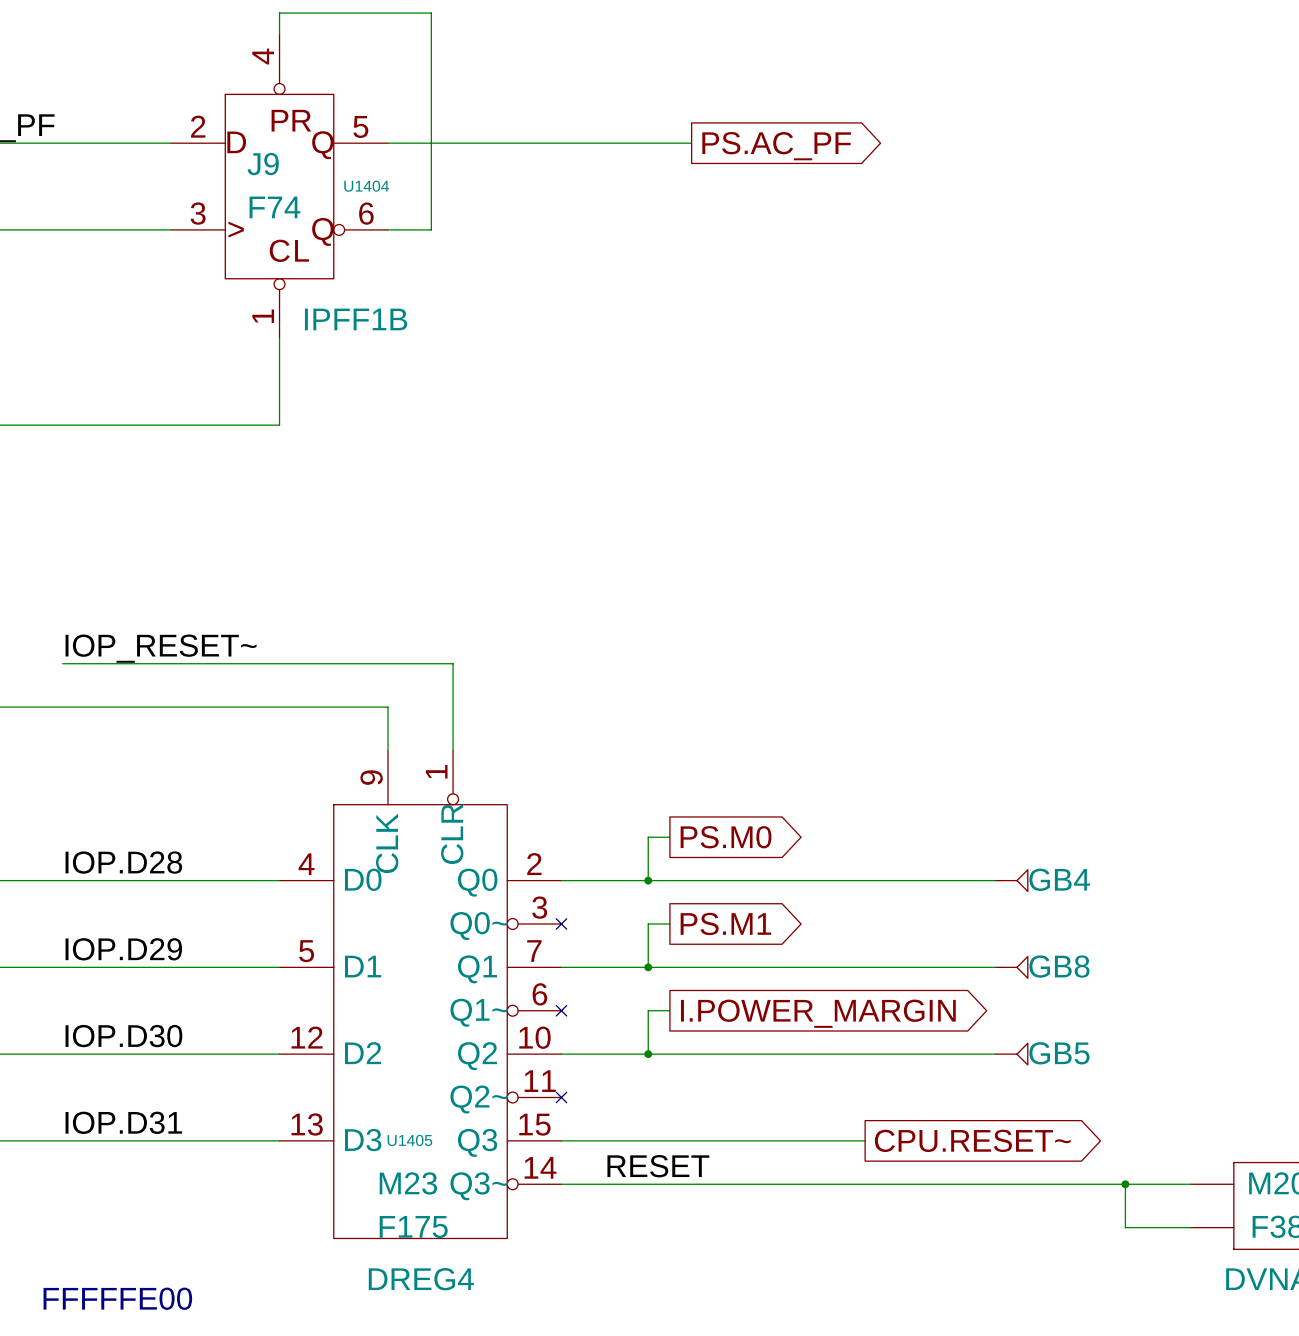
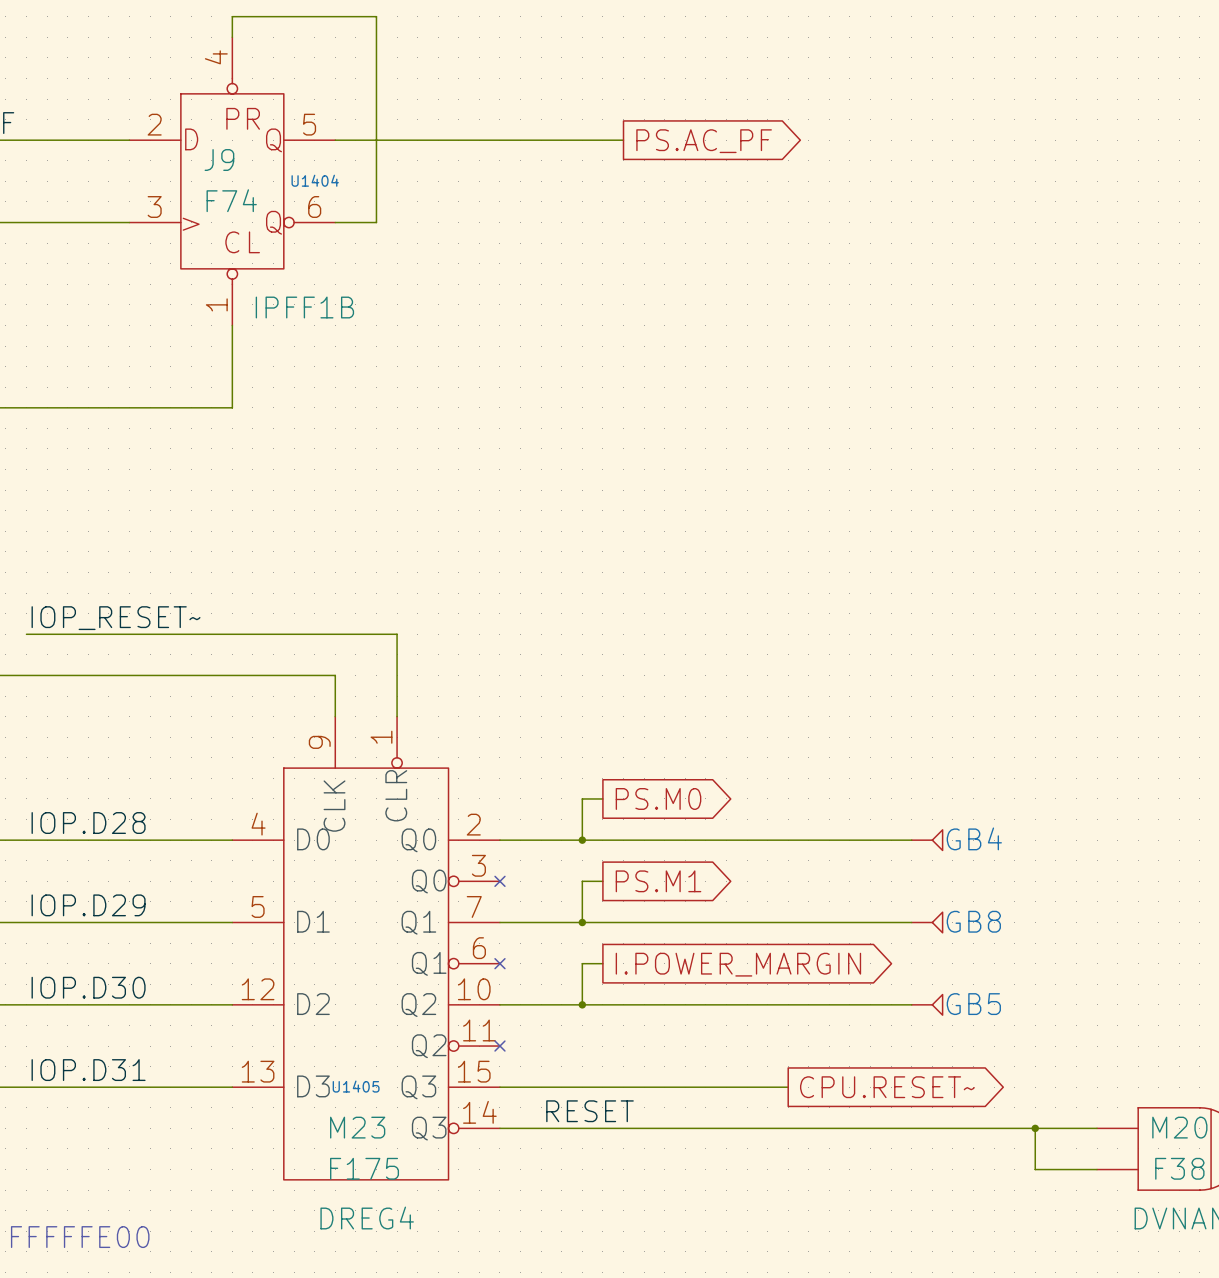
U1405 pin name: Q0~ (479, 925) -> Q0 (429, 881)
U1405 pin name: Q1~ (479, 1012) -> Q1 (429, 963)
U1405 pin name: Q2~ (479, 1099) -> Q2 (429, 1046)
U1405 pin name: Q3~ (479, 1186) -> Q3 (429, 1128)

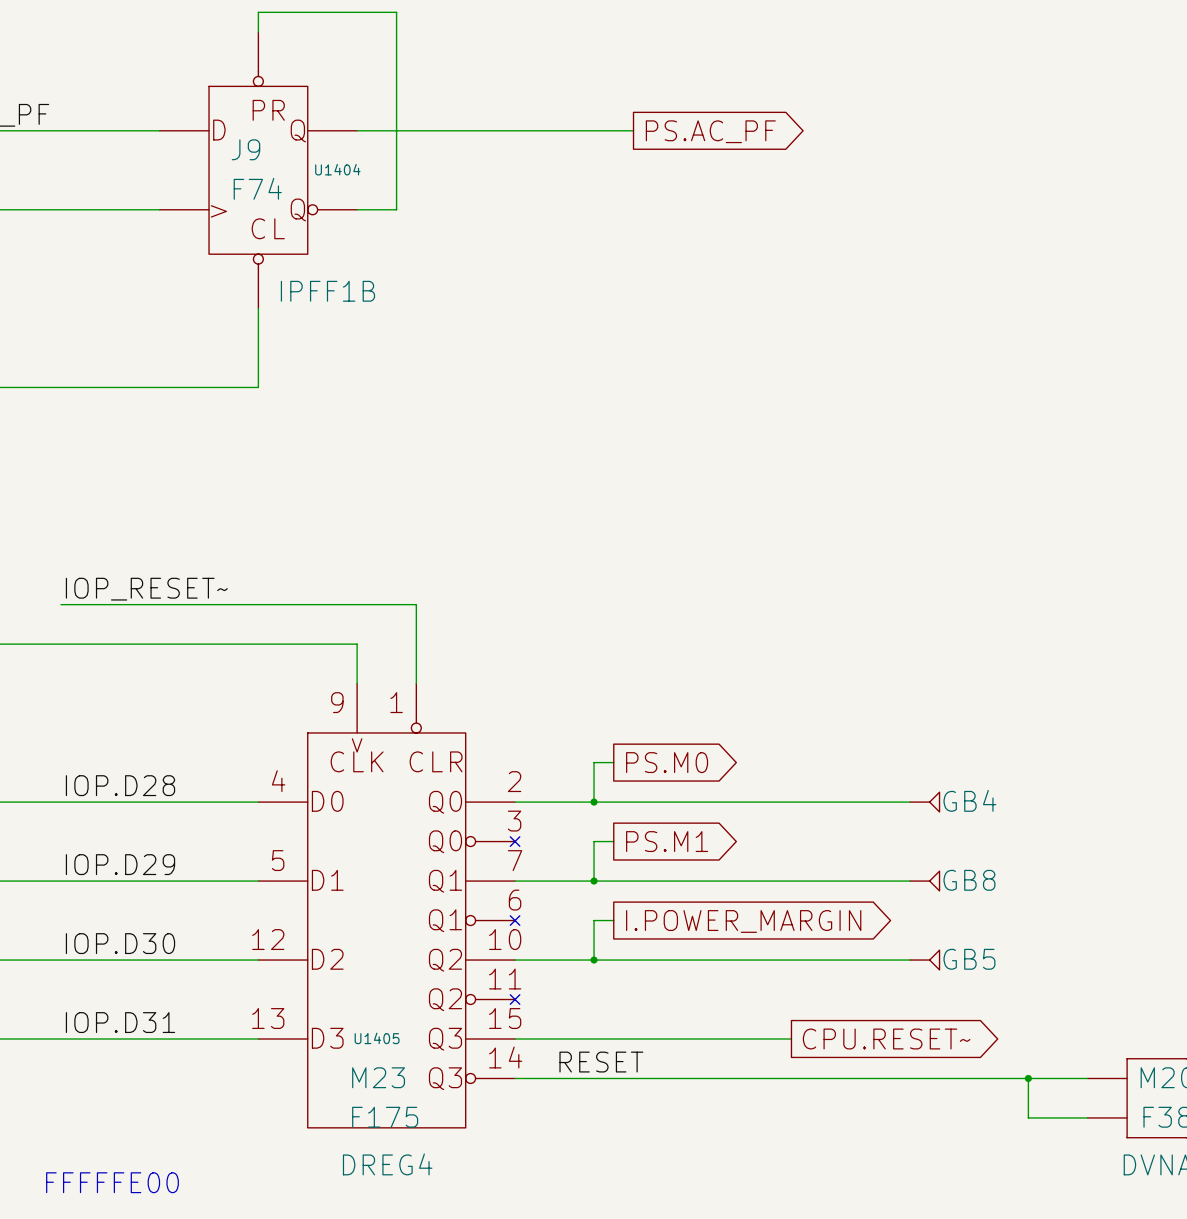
U1404 pin number: 4 (216, 57) -> none
U1404 pin number: 2 (154, 124) -> none
U1404 pin number: 5 (309, 124) -> none
U1404 pin number: 3 (154, 206) -> none
U1404 pin number: 6 (314, 206) -> none
U1404 pin number: 1 (216, 304) -> none
U1405 symbol: [232, 716, 500, 1180] -> [258, 683, 516, 1128]

